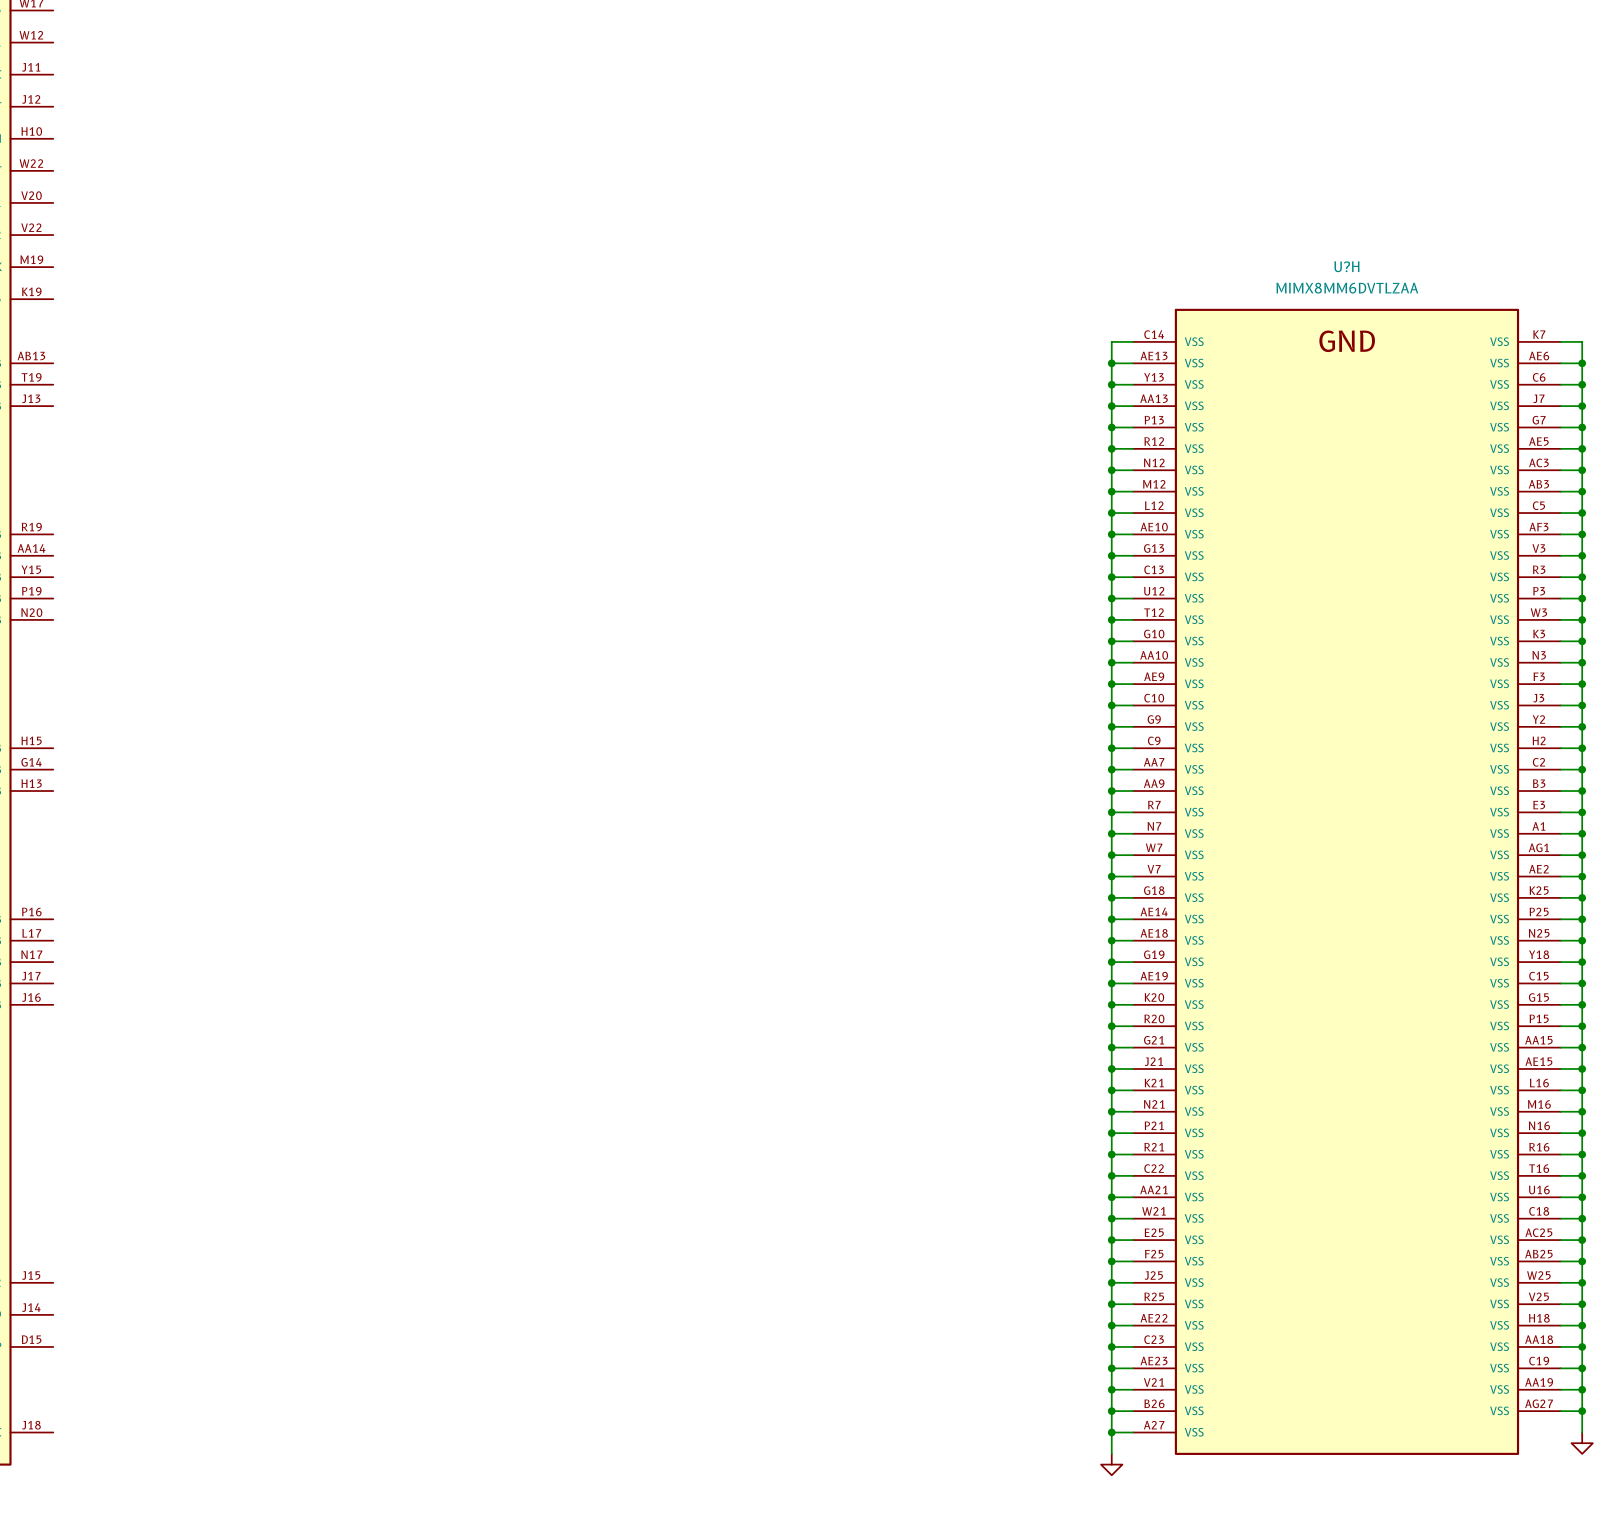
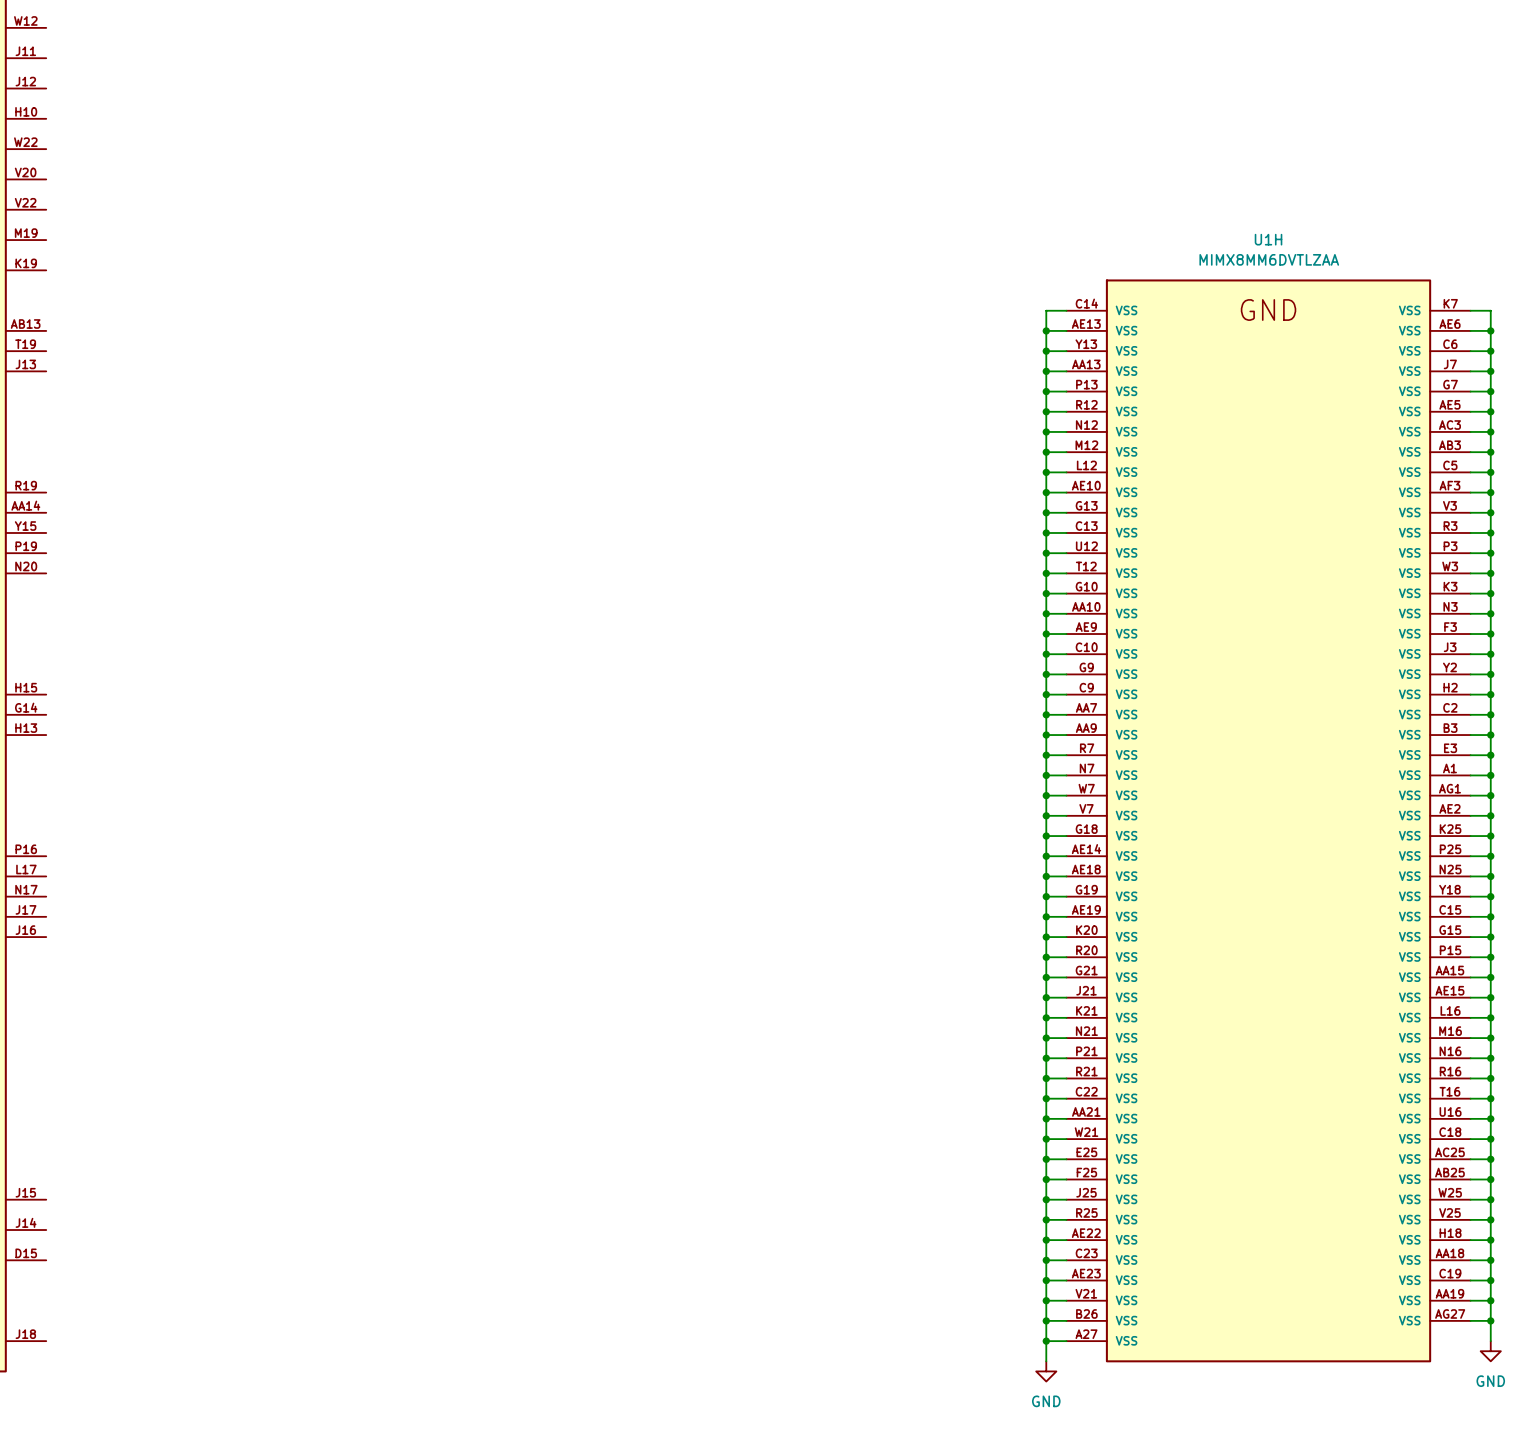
U?H name: U?H (1346, 266) -> U1H (1268, 239)
power symbol text: none -> GND (1490, 1381)
power symbol text: none -> GND (1046, 1401)

